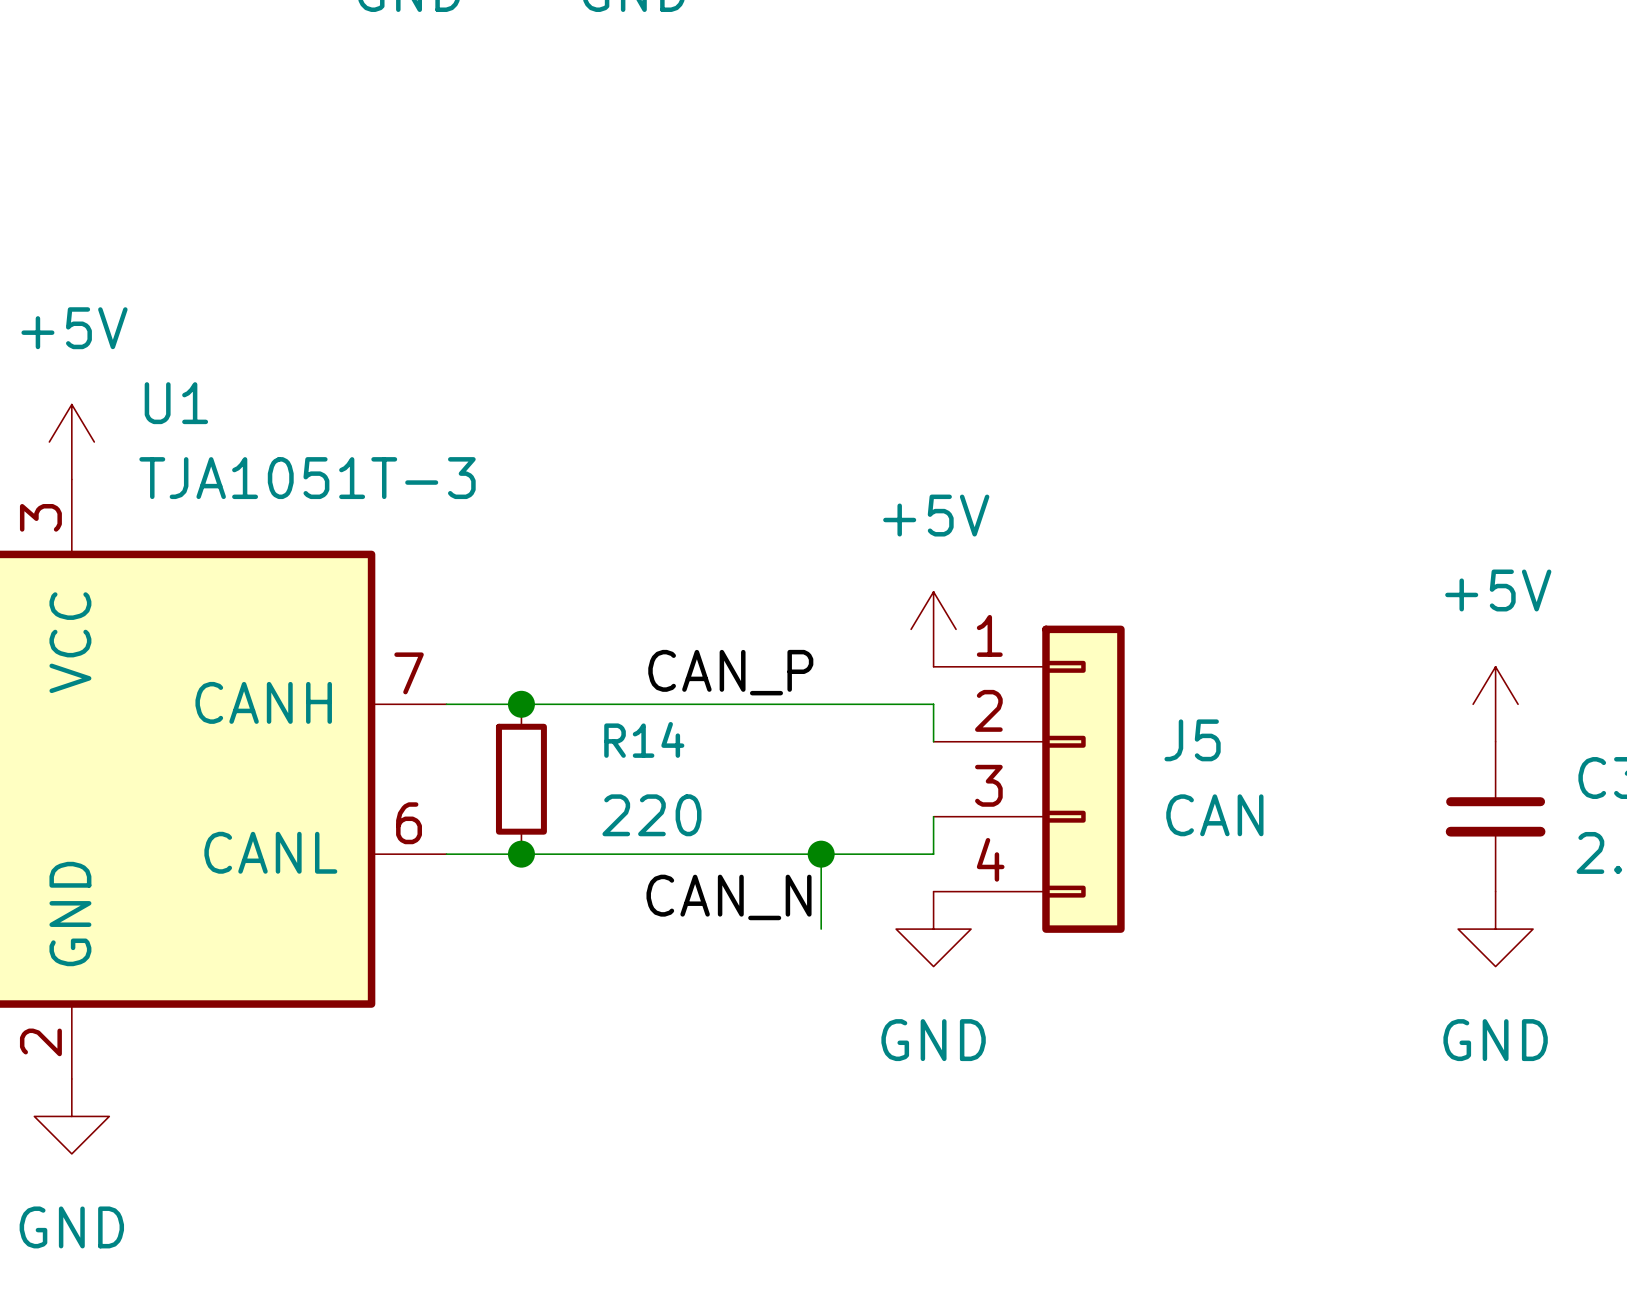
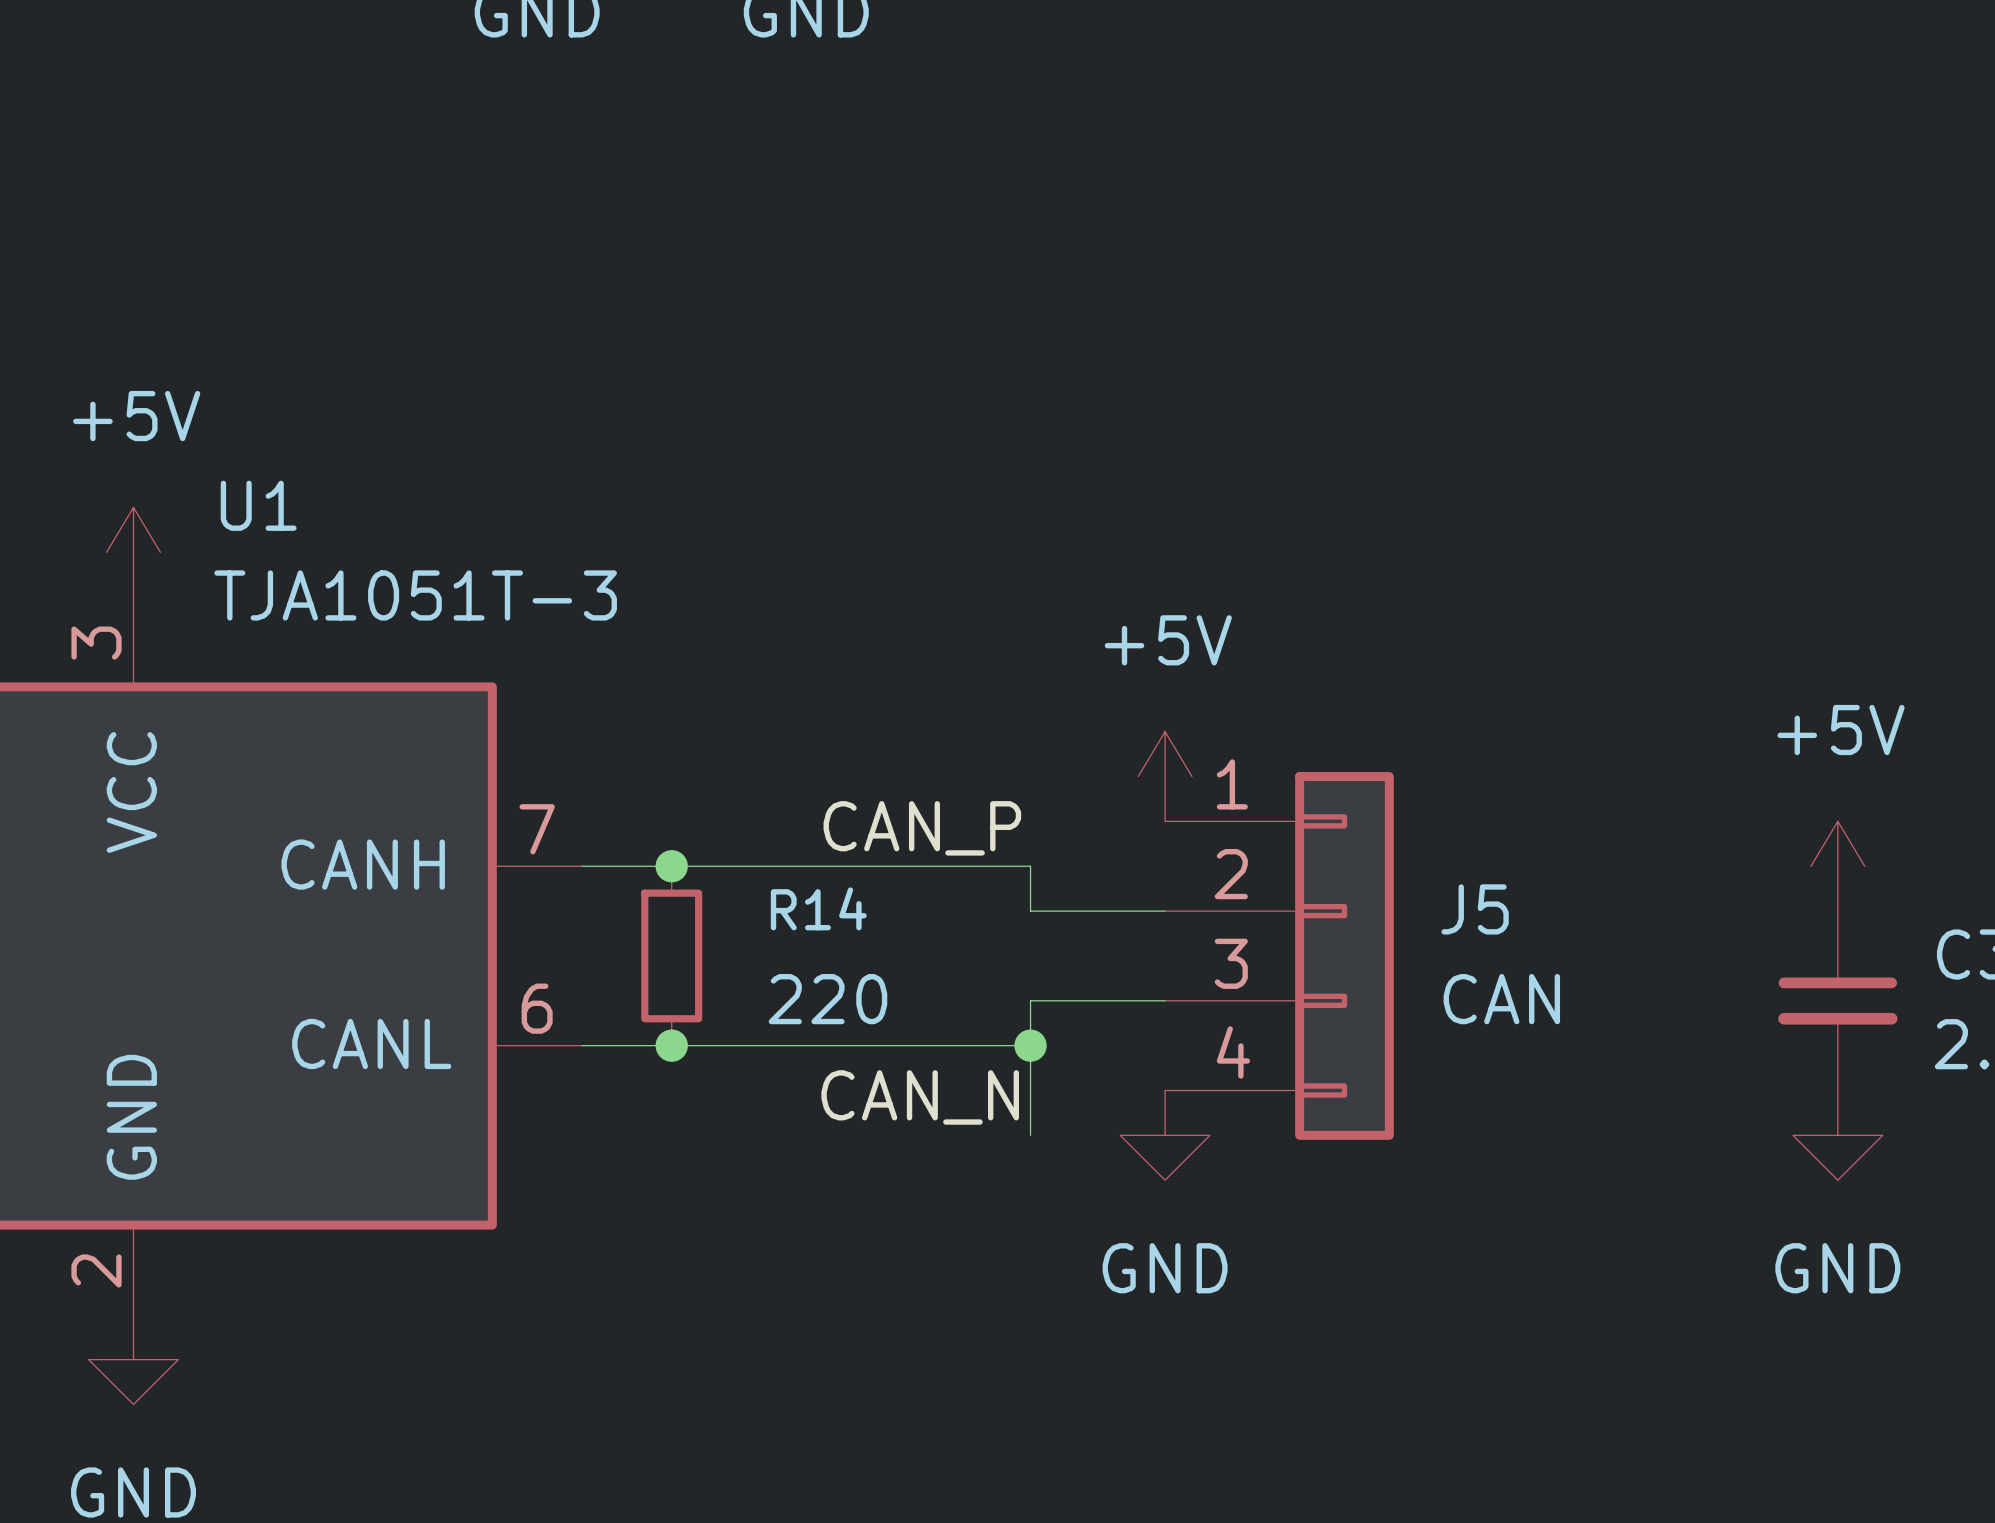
wire: (821, 704) (933, 704) (933, 741) -> (1030, 866) (1030, 911) (1165, 911)
wire: (933, 816) (933, 854) (821, 854) -> (1165, 1000) (1030, 1000) (1030, 1045)

